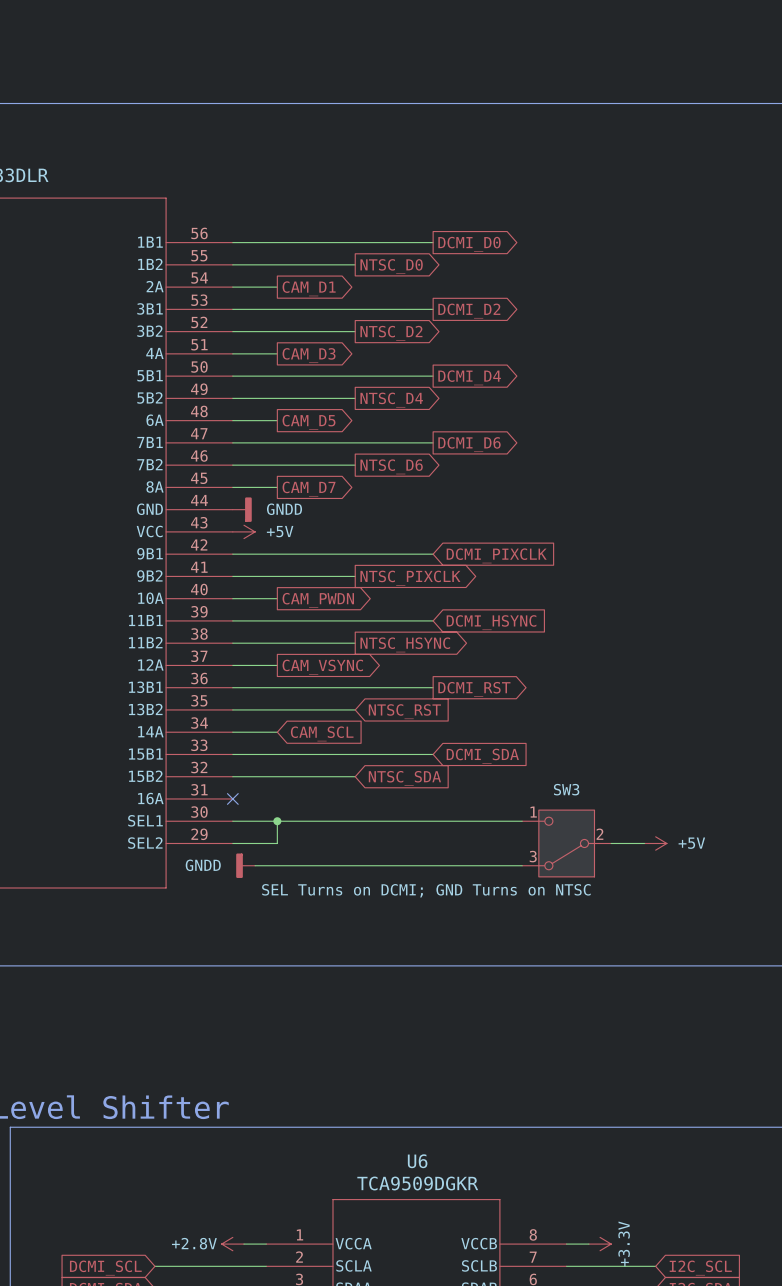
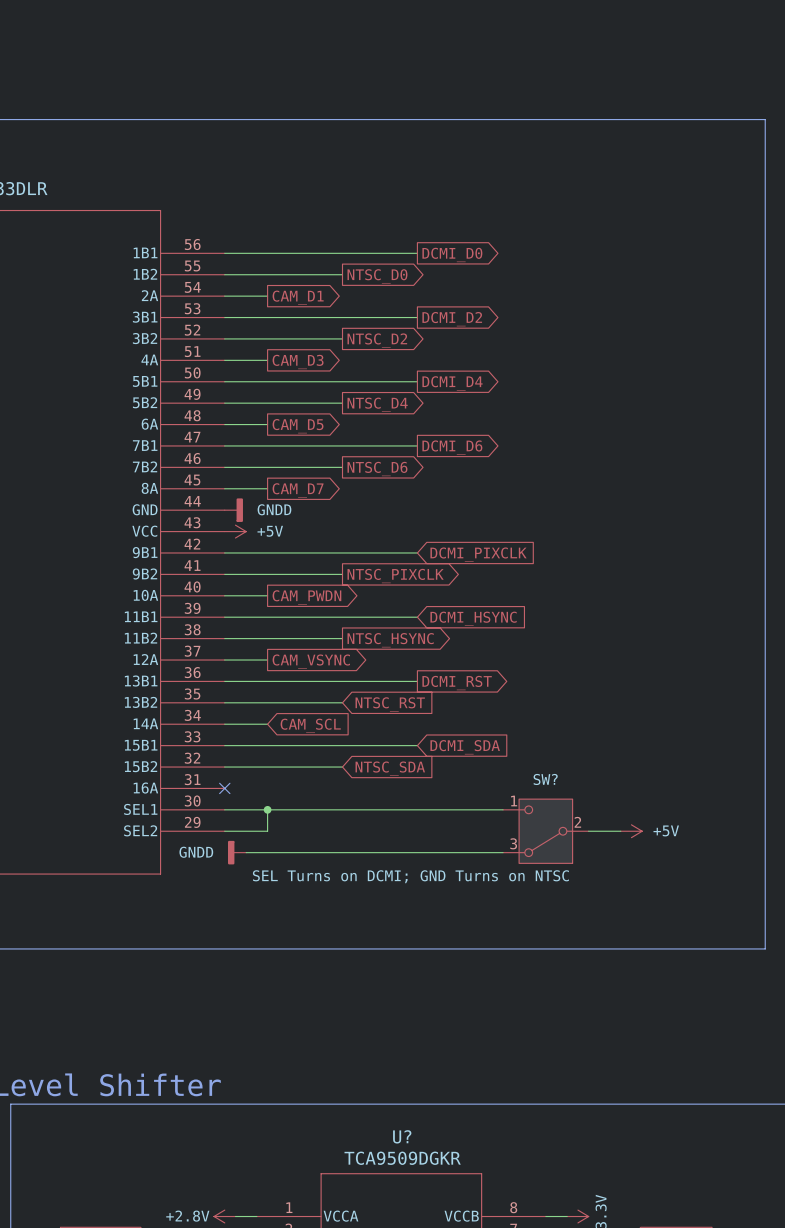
SW3 name: SW3 (566, 789) -> SW? (545, 779)
U6 name: U6 (417, 1161) -> U? (402, 1136)

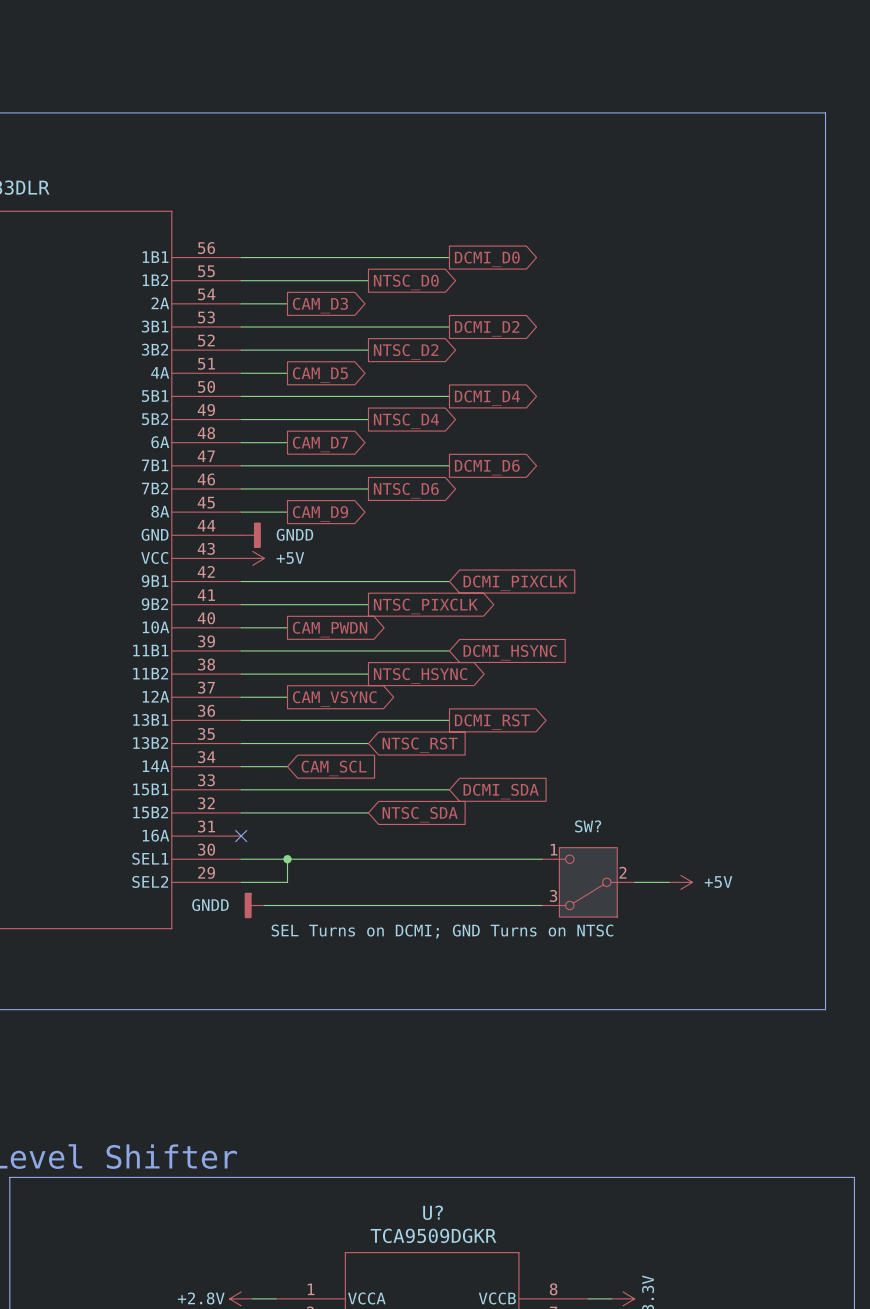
global label: CAM_D1 (298, 297) -> CAM_D3 (320, 305)
global label: CAM_D3 (298, 361) -> CAM_D5 (320, 375)
global label: CAM_D5 (298, 426) -> CAM_D7 (320, 444)
global label: CAM_D7 (298, 490) -> CAM_D9 (320, 513)

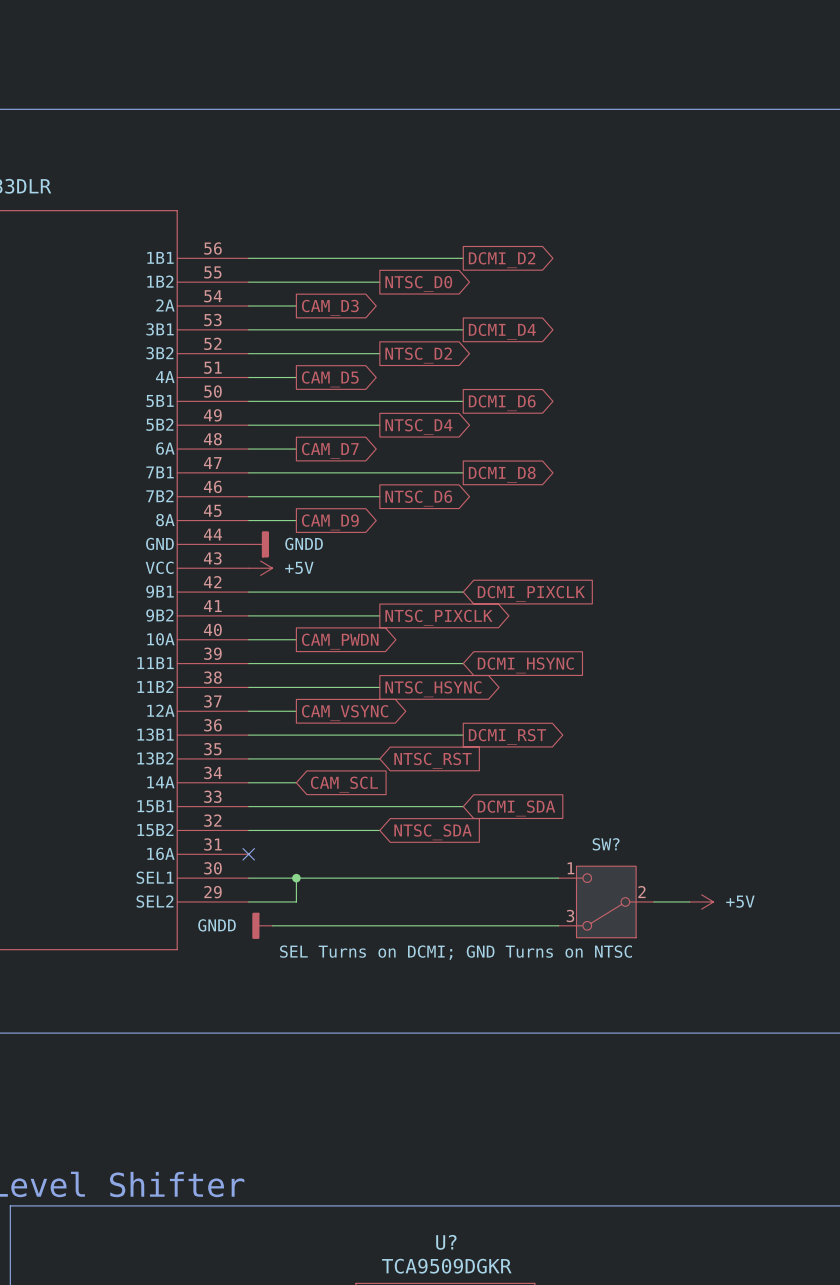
global label: DCMI_D0 (487, 259) -> DCMI_D2 (502, 260)
global label: DCMI_D2 (487, 328) -> DCMI_D4 (502, 331)
global label: DCMI_D4 (487, 398) -> DCMI_D6 (502, 403)
global label: DCMI_D6 (487, 467) -> DCMI_D8 (502, 474)

